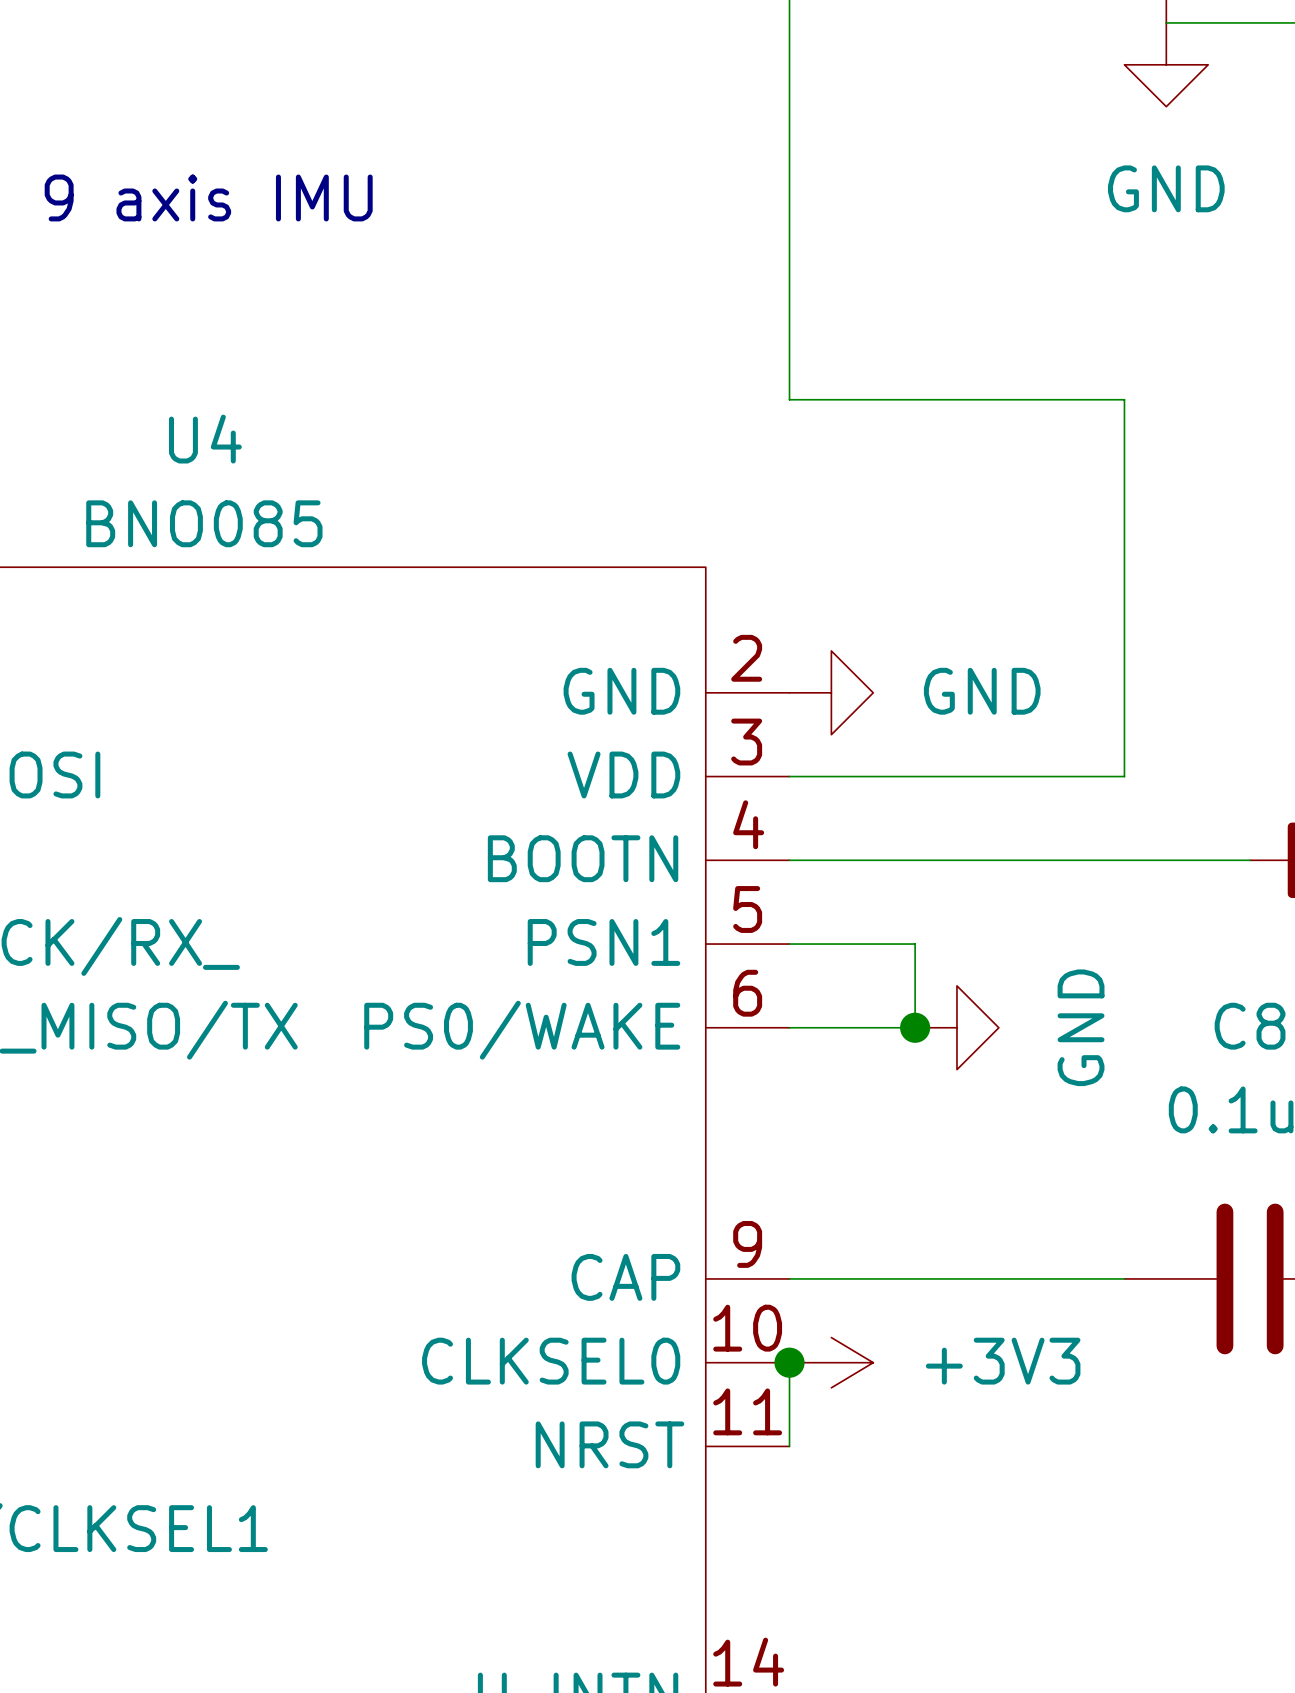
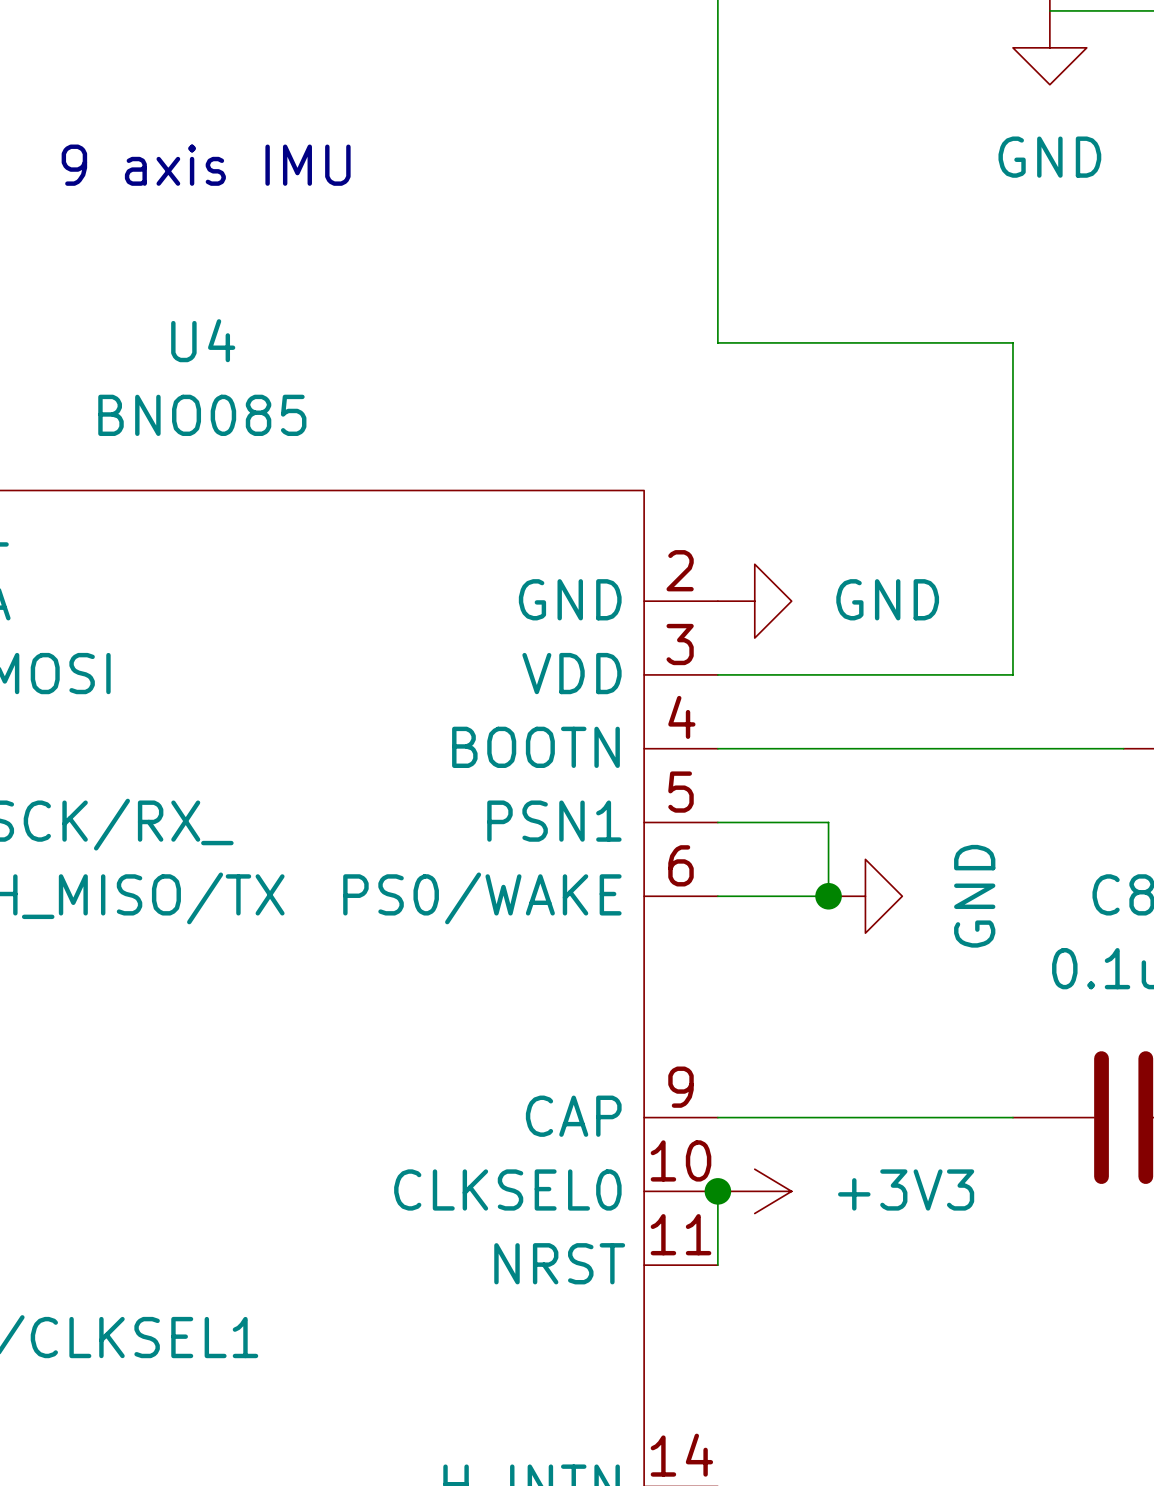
U4 name position: U4 (205, 439) -> U4 (203, 340)
U4 value position: BNO085 (204, 523) -> BNO085 (202, 415)

